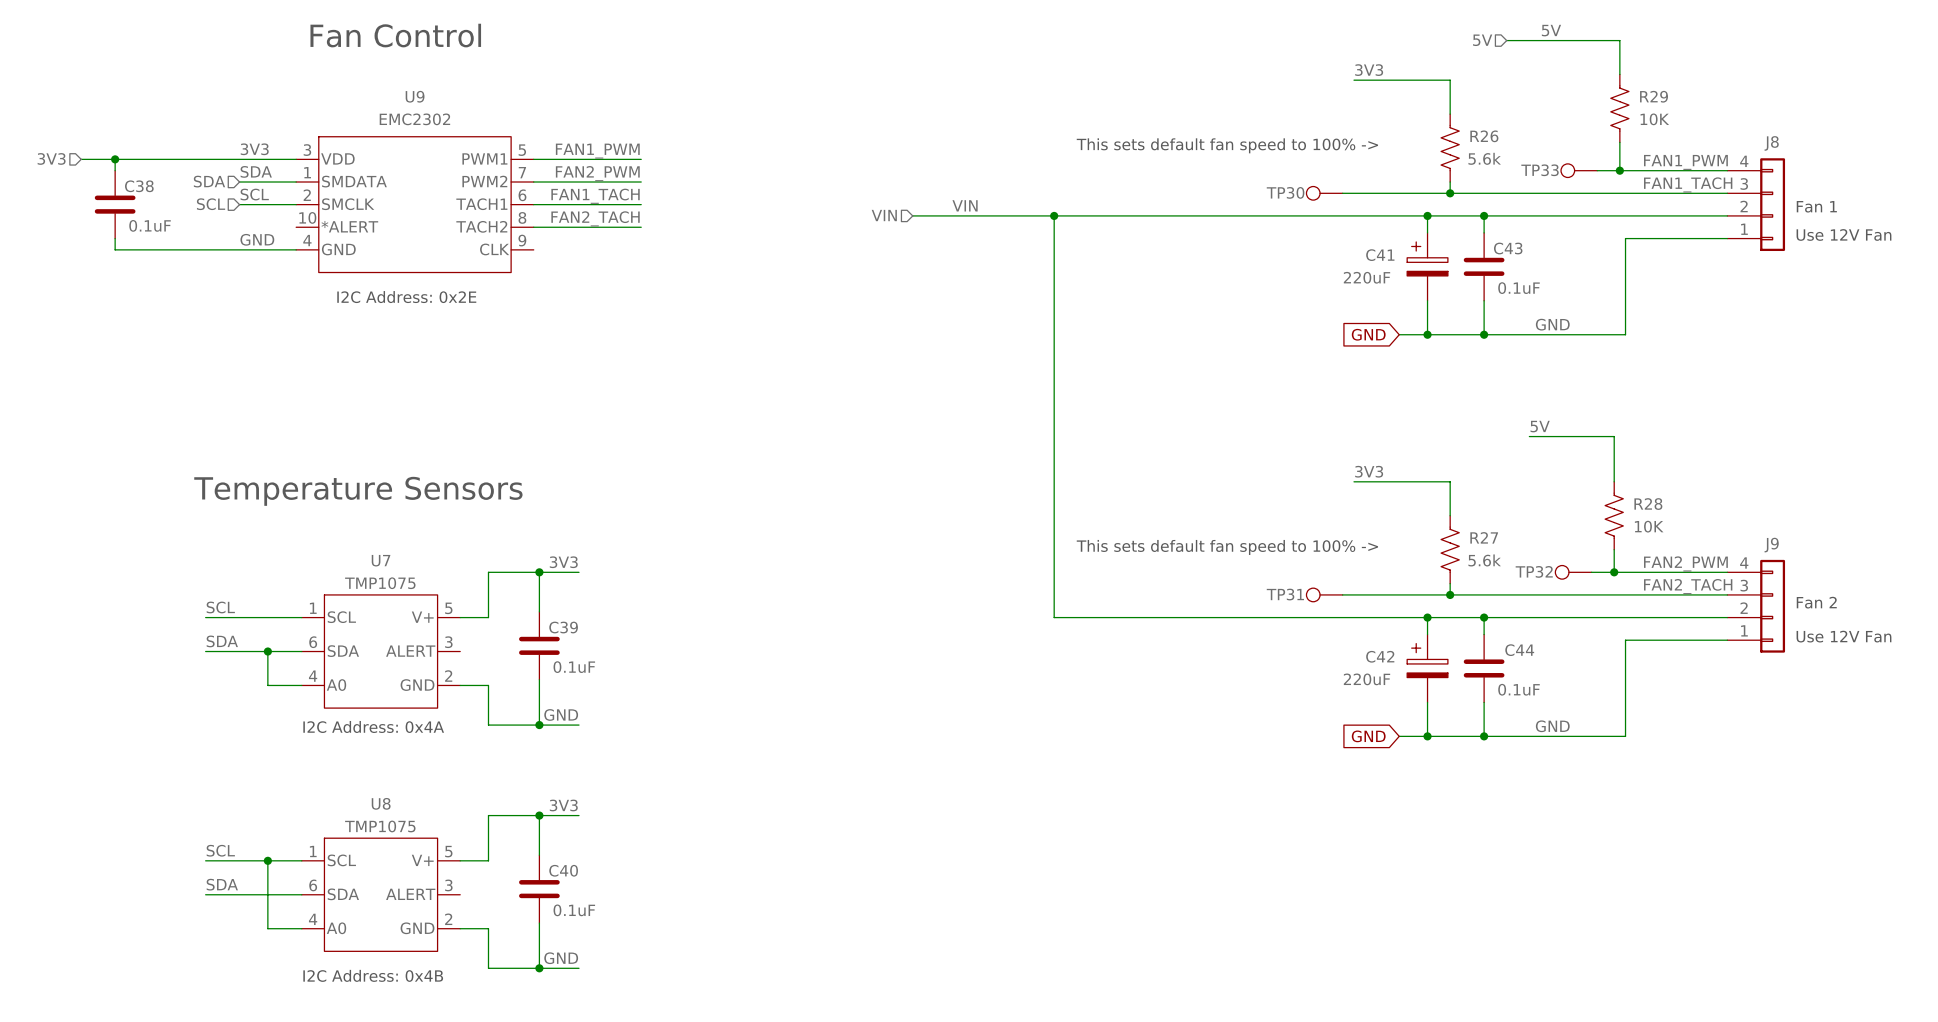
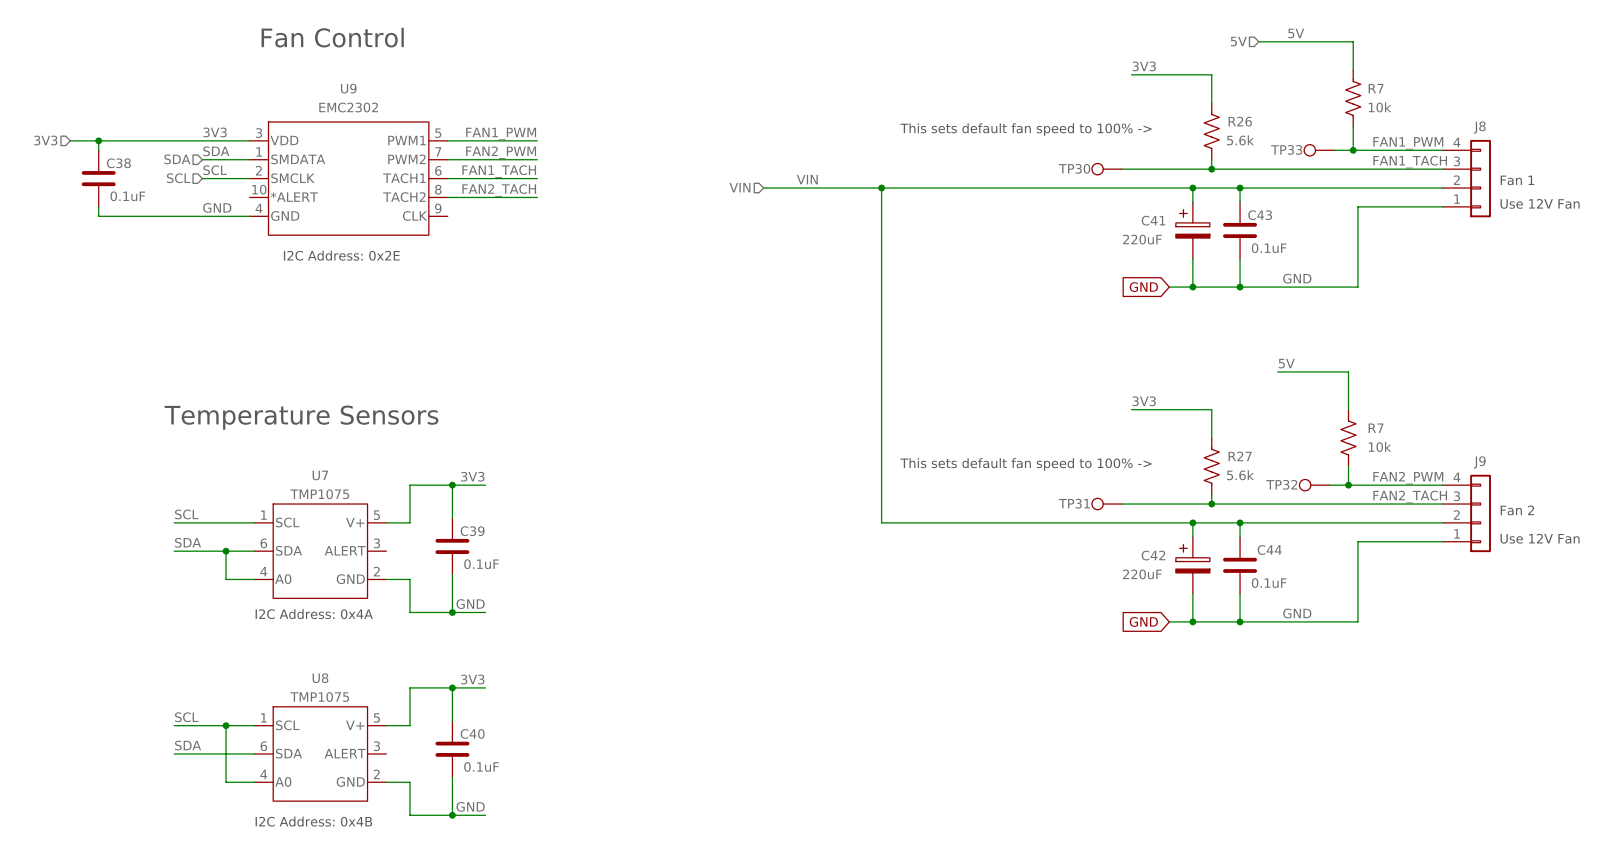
R29 name: R29 (1654, 96) -> R7 (1376, 88)
R29 value: 10K (1654, 119) -> 10k (1380, 107)
R28 name: R28 (1648, 504) -> R7 (1376, 428)
R28 value: 10K (1649, 526) -> 10k (1380, 446)

